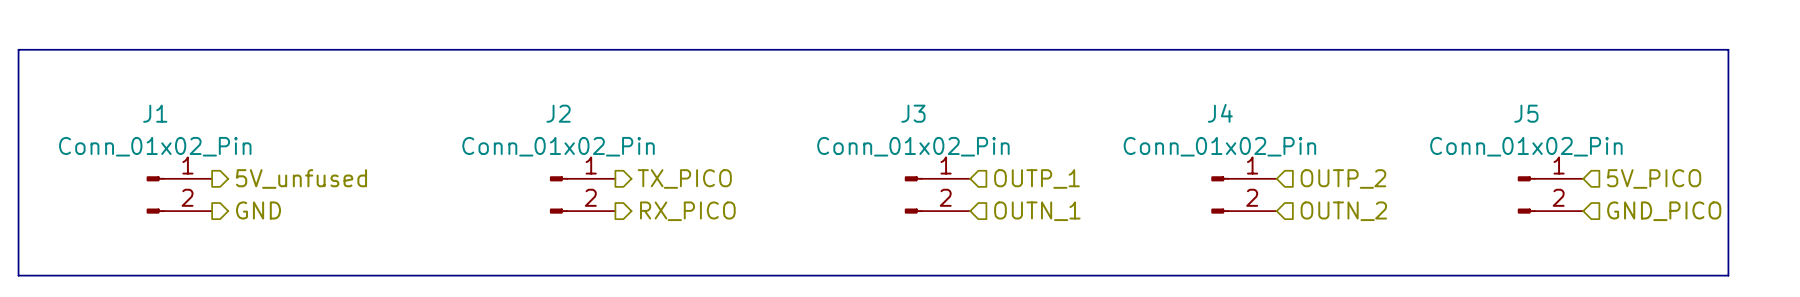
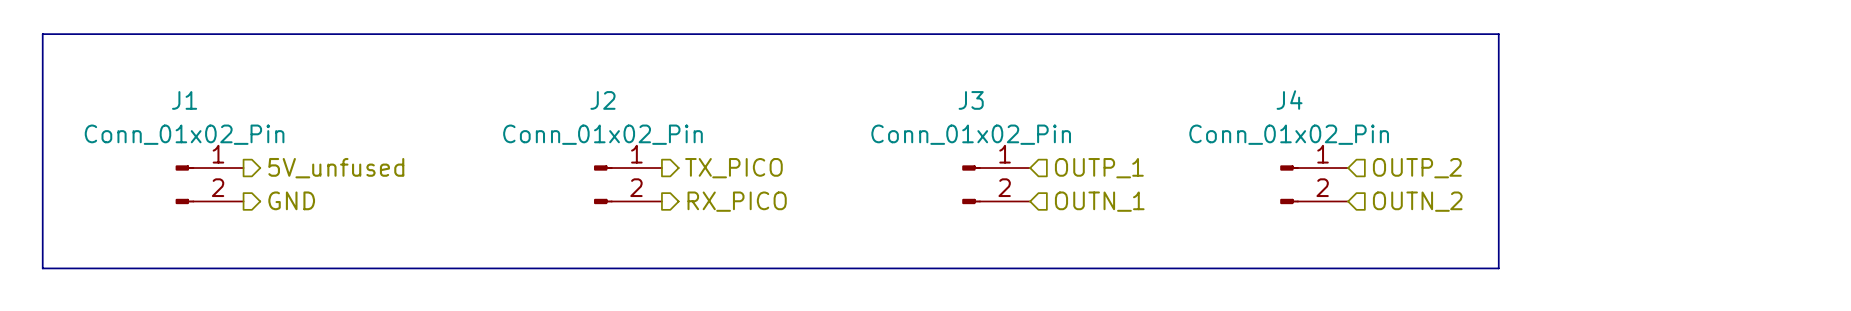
line: (1421, 49) (1728, 49) (1728, 275) (1421, 275) -> (1498, 34) (1498, 268)
hierarchical label: 5V_PICO (1654, 178) -> none
J5: Conn_01x02_Pin (1550, 194) -> none
hierarchical label: GND_PICO (1664, 211) -> none

